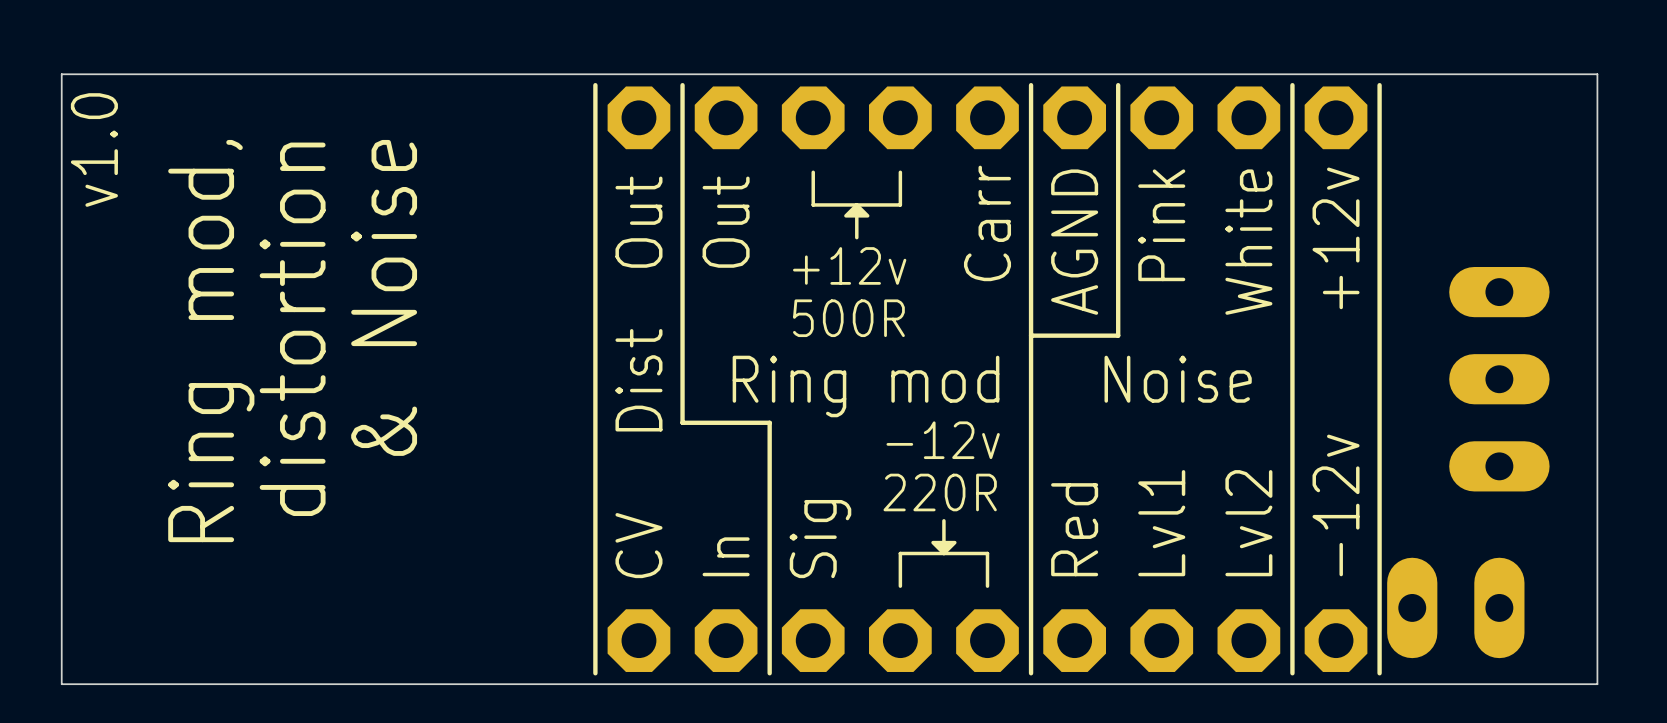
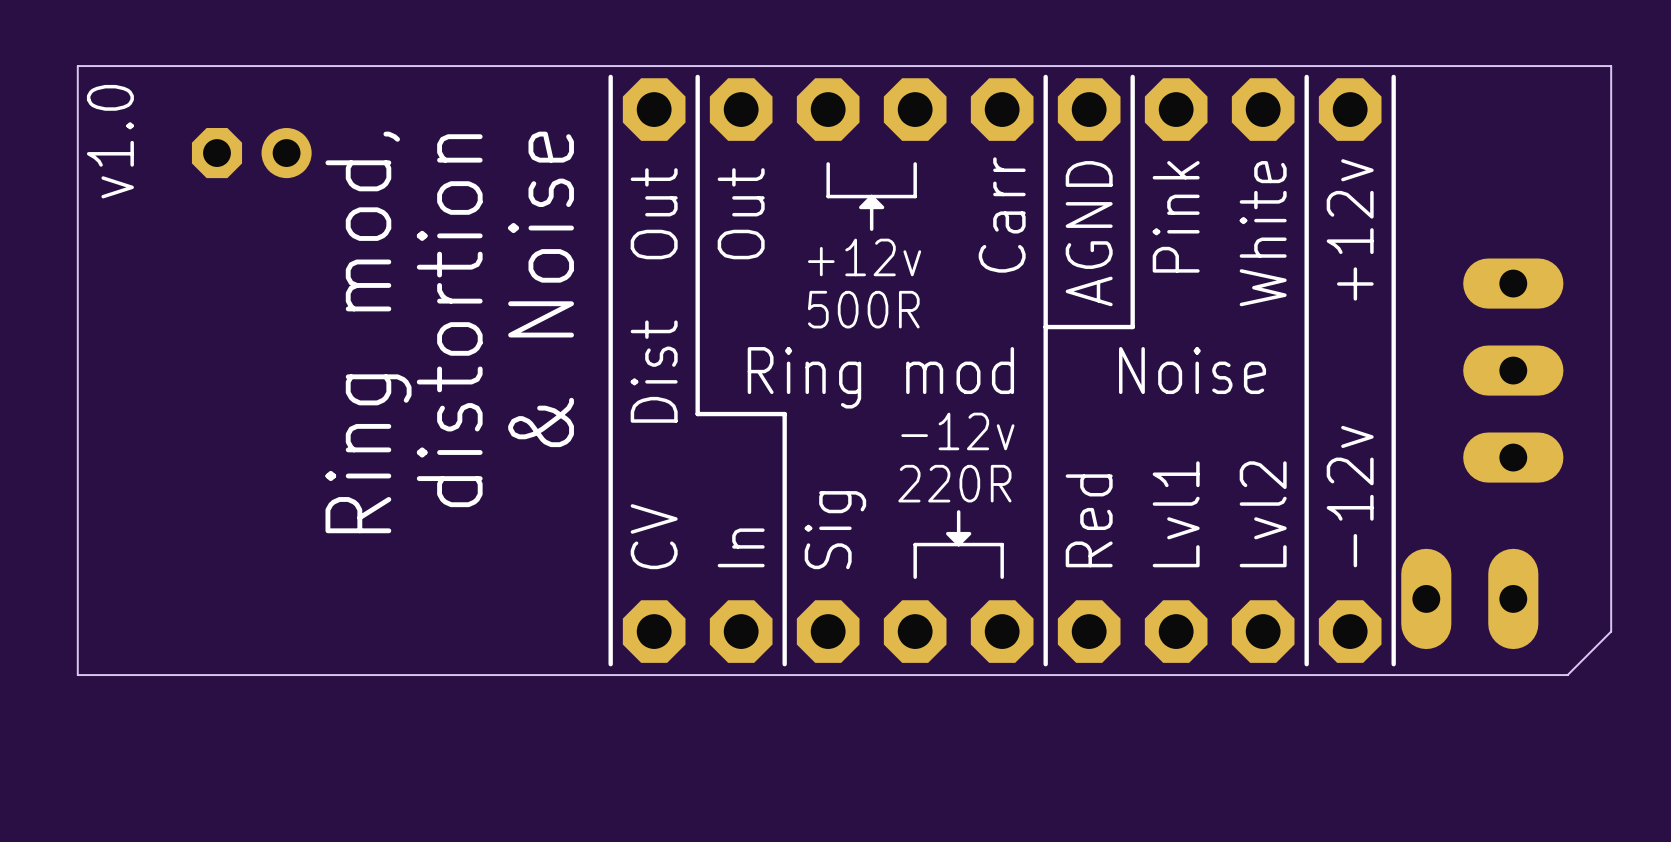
part: none -> (251, 153)
text position: & Noise (384, 297) -> & Noise (541, 289)
text position: distortion (292, 329) -> distortion (449, 320)
text position: Ring mod, (211, 341) -> Ring mod, (368, 332)
board edge: (1597, 640) (1597, 684) (1553, 684) -> (1611, 631) (1567, 675)

